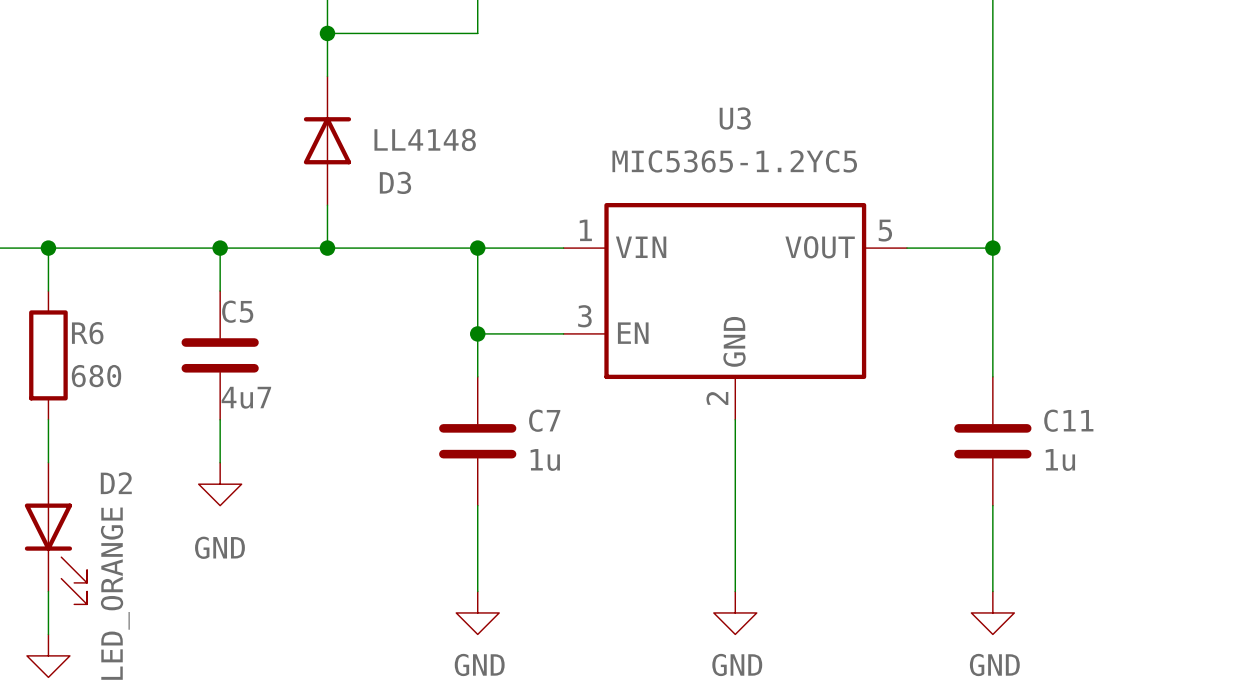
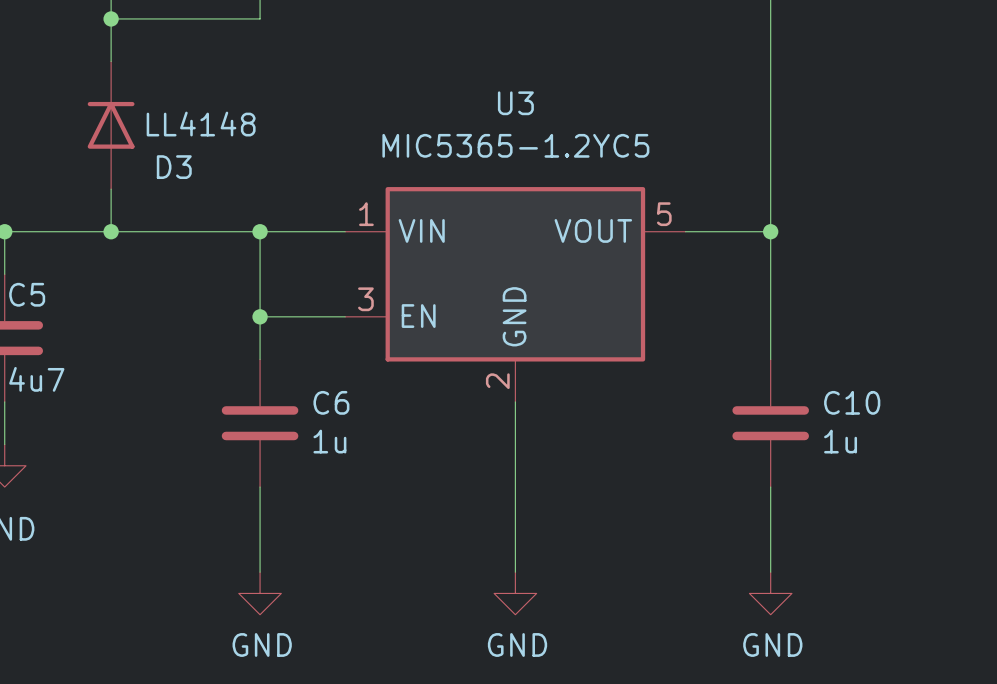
C7 name: C7 (544, 420) -> C6 (331, 402)
C11 name: C11 (1068, 420) -> C10 (852, 402)

